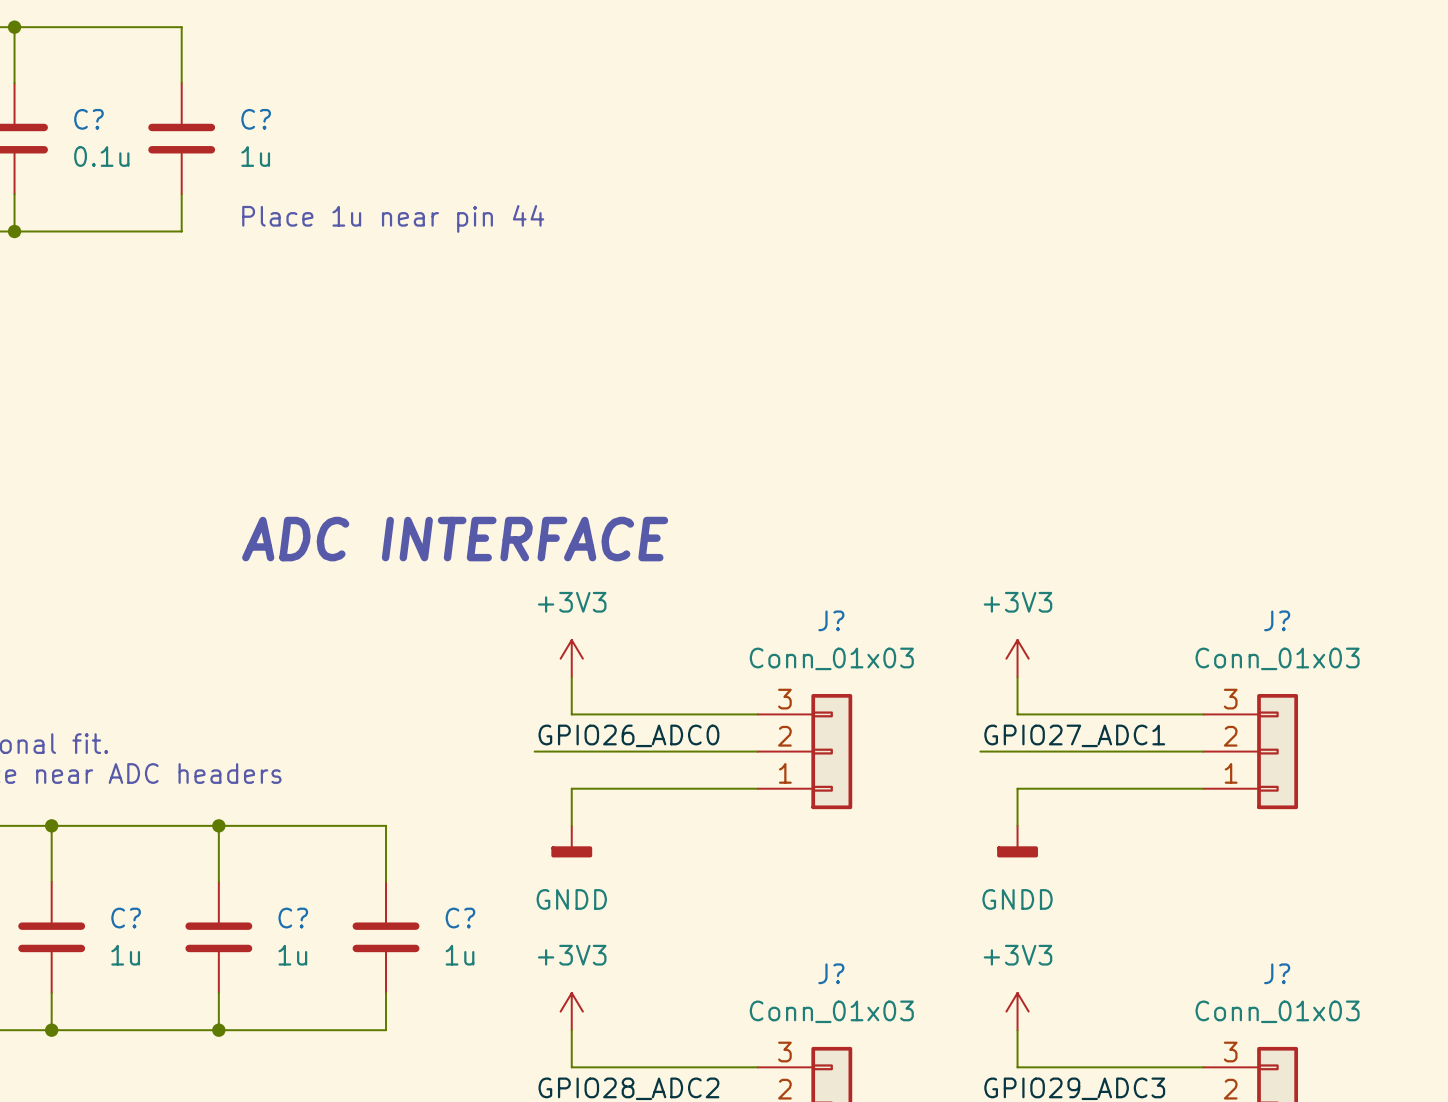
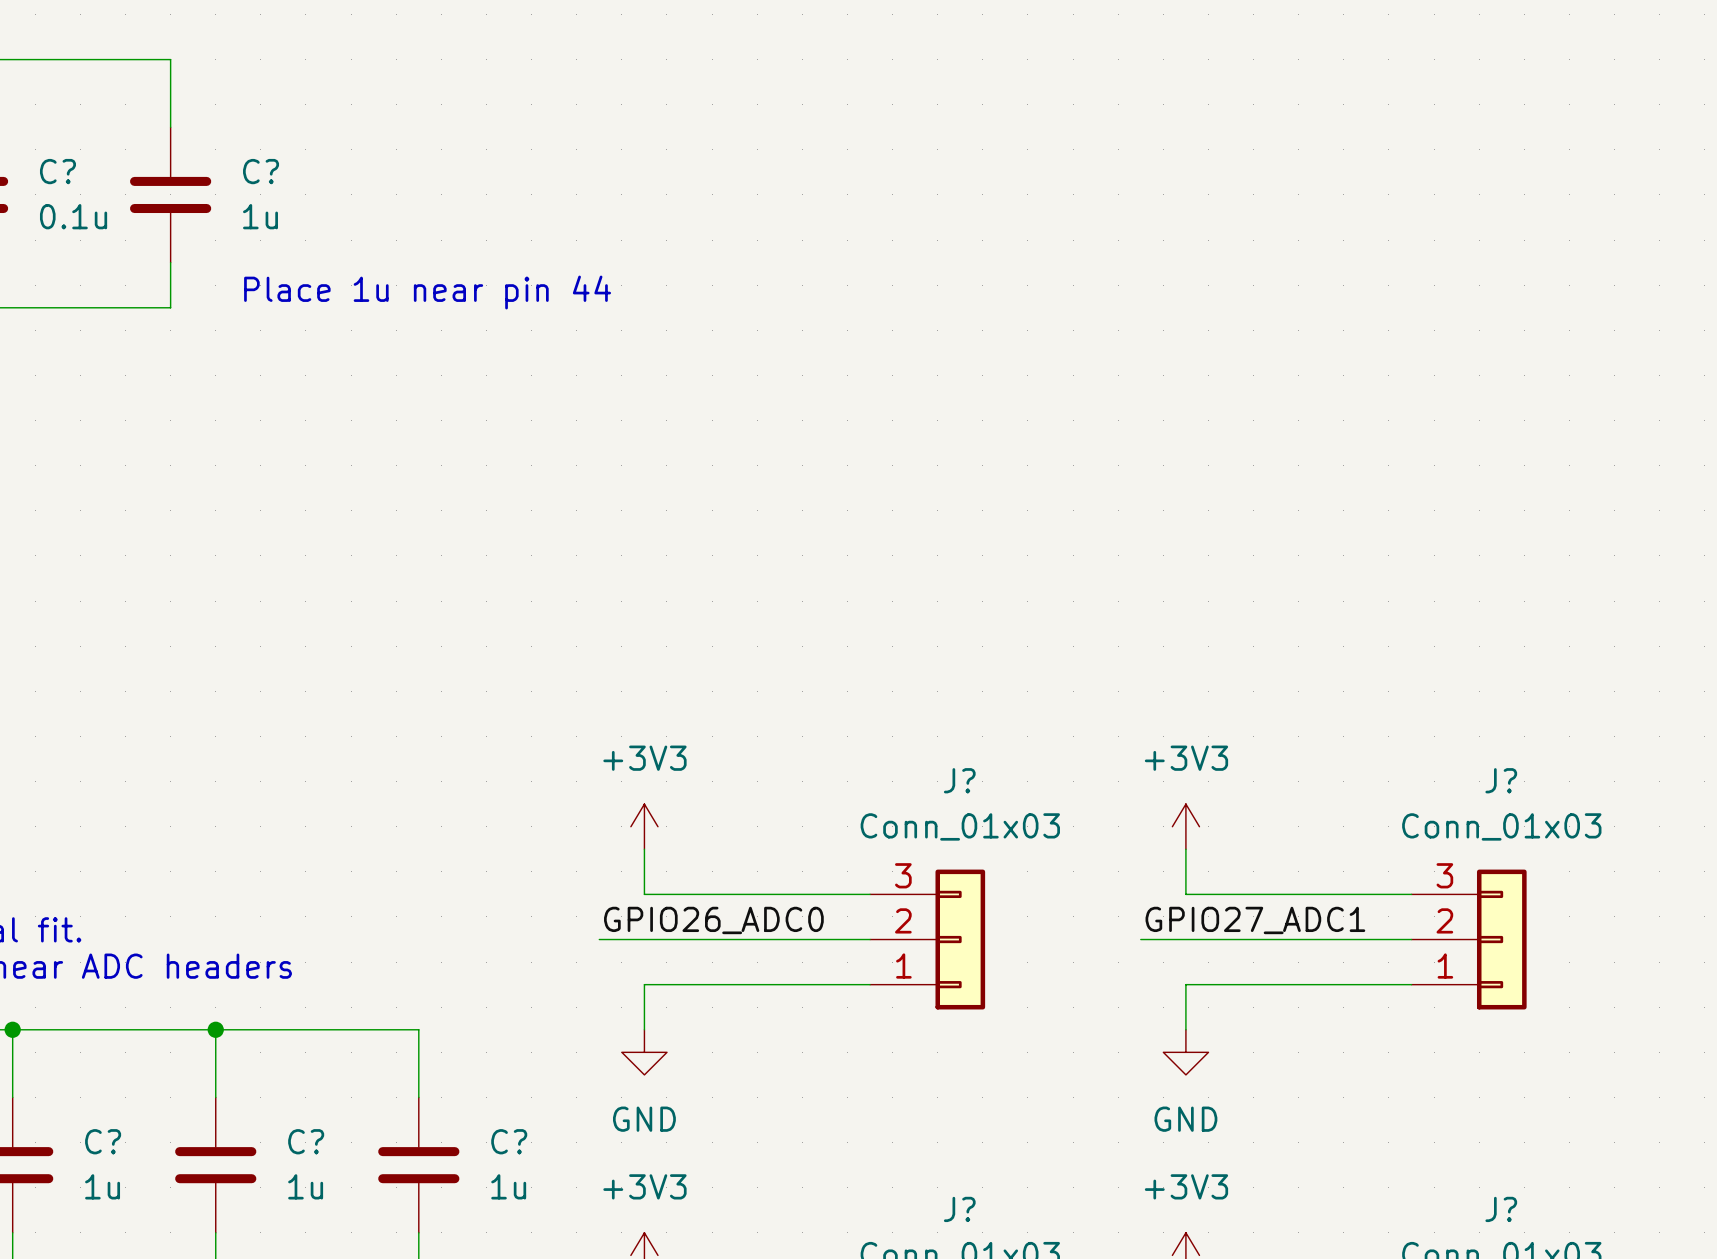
text: ADC INTERFACE (455, 539) -> none
power symbol: GNDD (571, 841) -> GND (644, 1052)
power symbol: GNDD (1017, 841) -> GND (1185, 1052)

